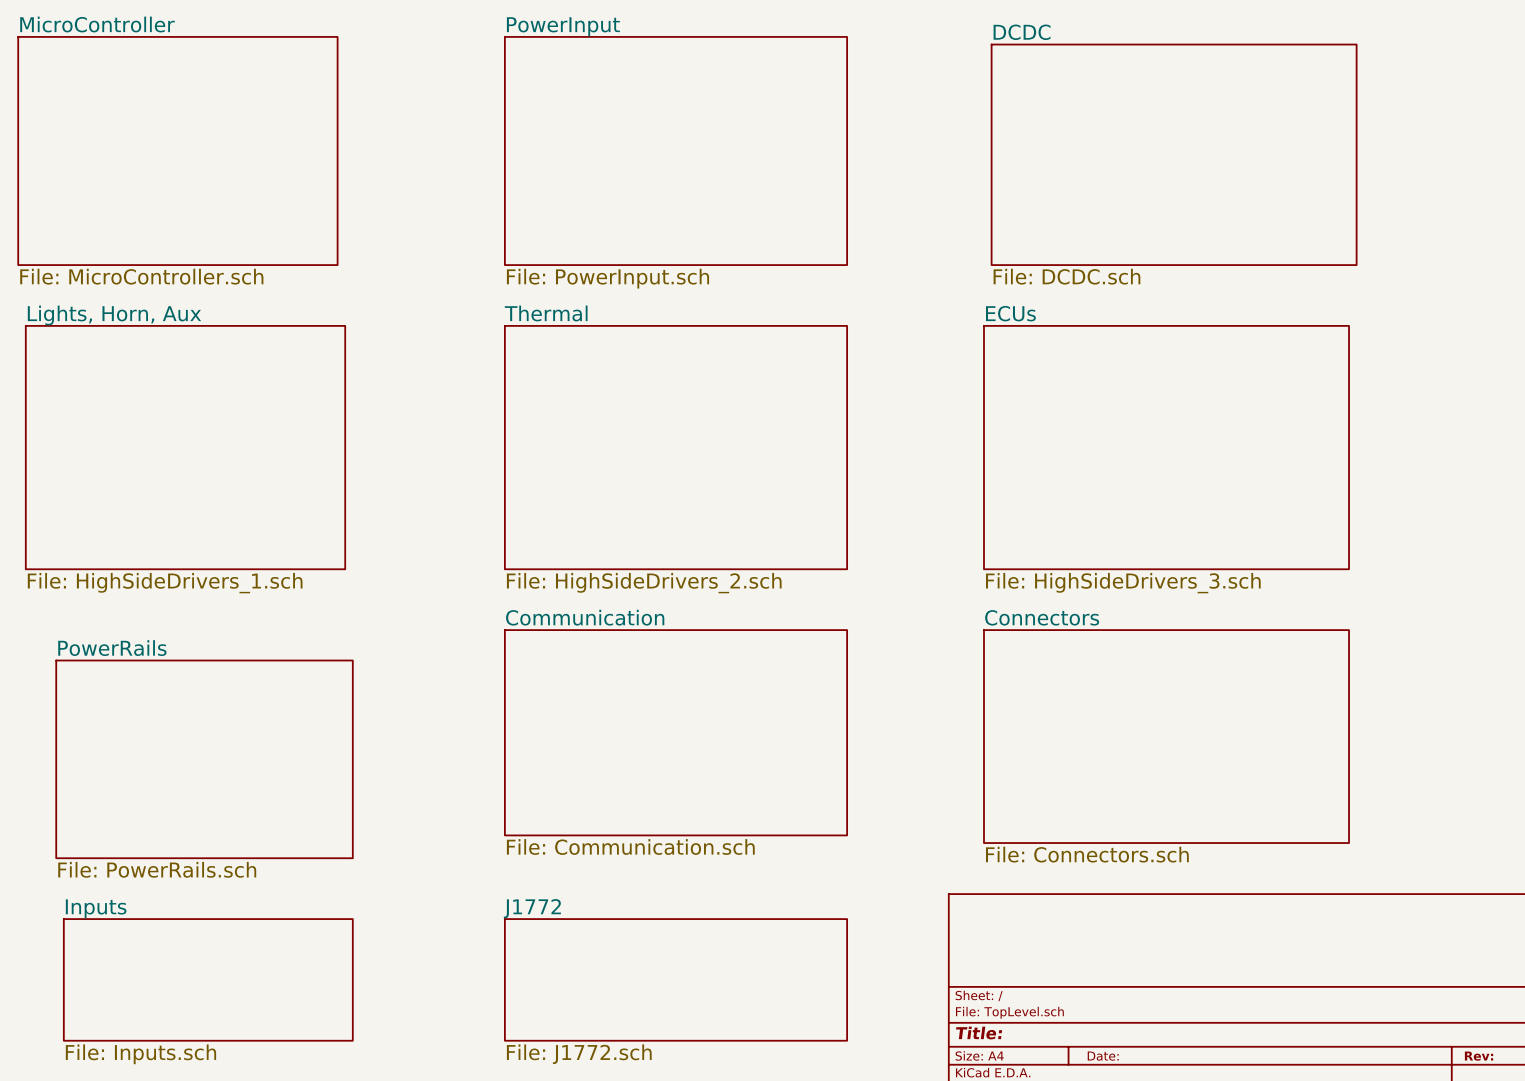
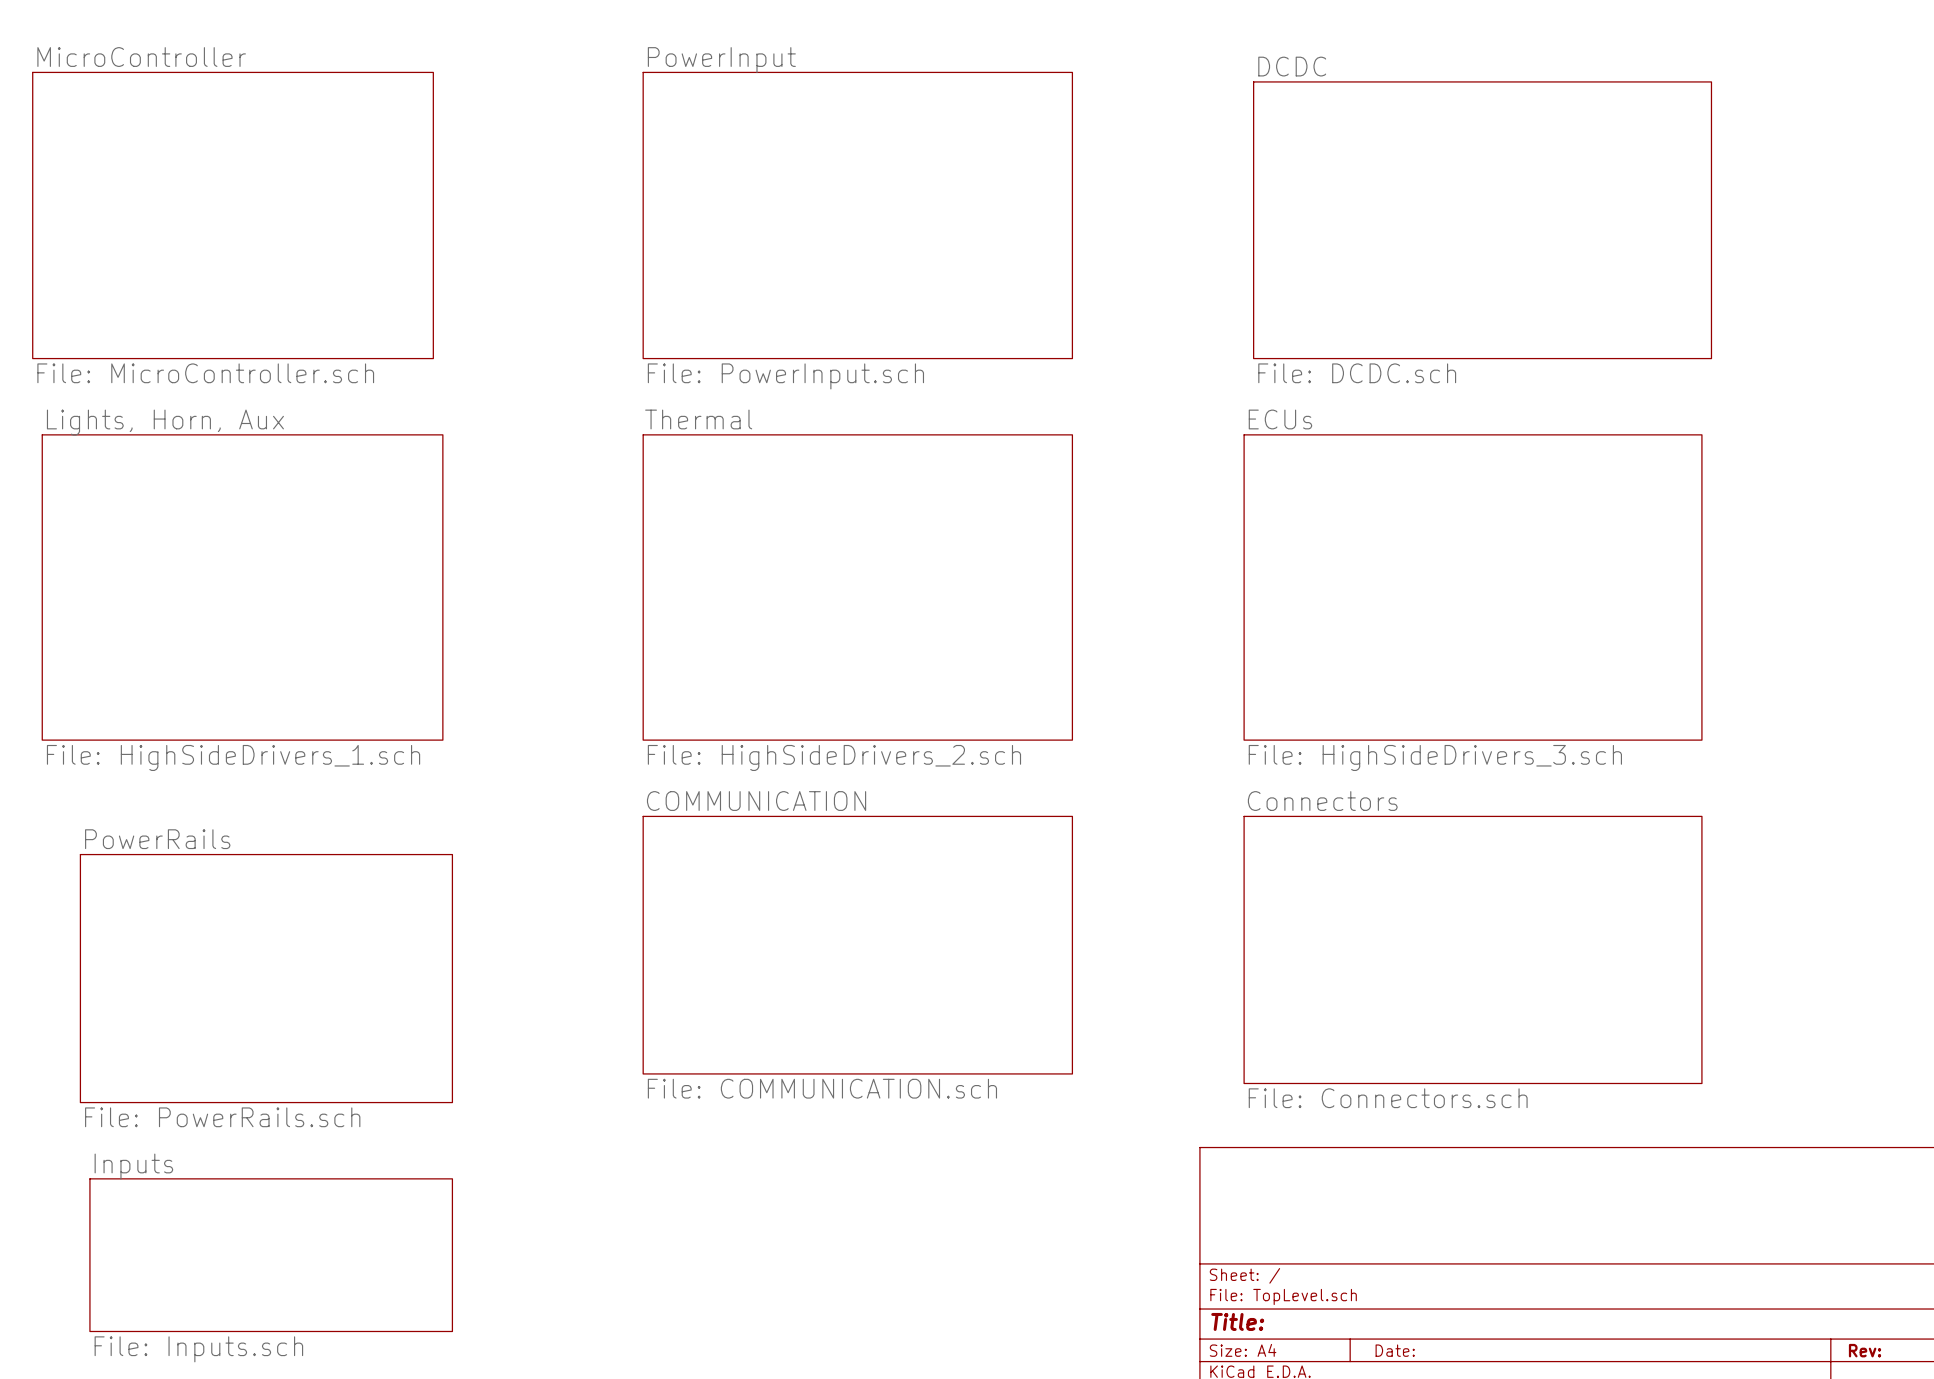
sheet Communication name: Communication (585, 617) -> COMMUNICATION (756, 801)
sheet Communication value: File: Communication.sch (630, 847) -> File: COMMUNICATION.sch (822, 1088)
sheet J1772: File: J1772.sch (676, 979) -> none

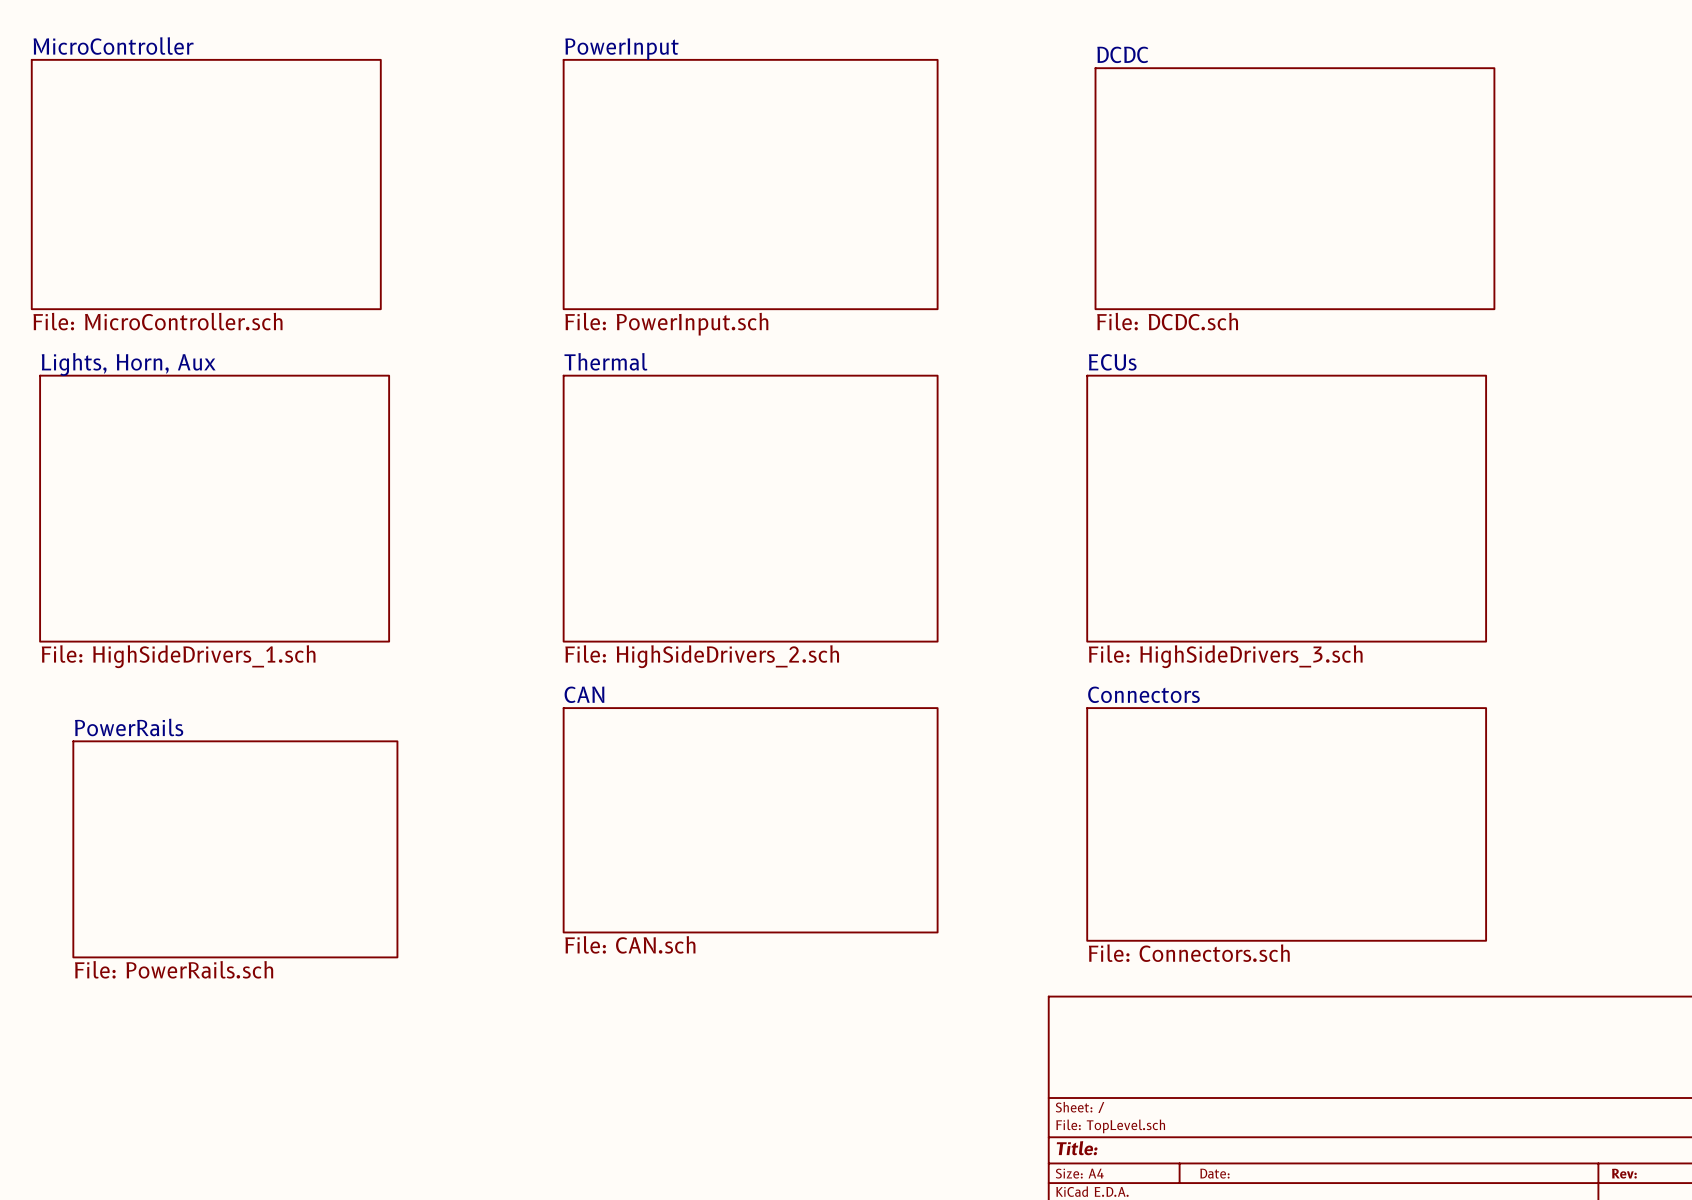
sheet COMMUNICATION name: COMMUNICATION (756, 801) -> CAN (584, 694)
sheet COMMUNICATION value: File: COMMUNICATION.sch (822, 1088) -> File: CAN.sch (630, 944)
sheet Inputs: File: Inputs.sch (271, 1255) -> none

